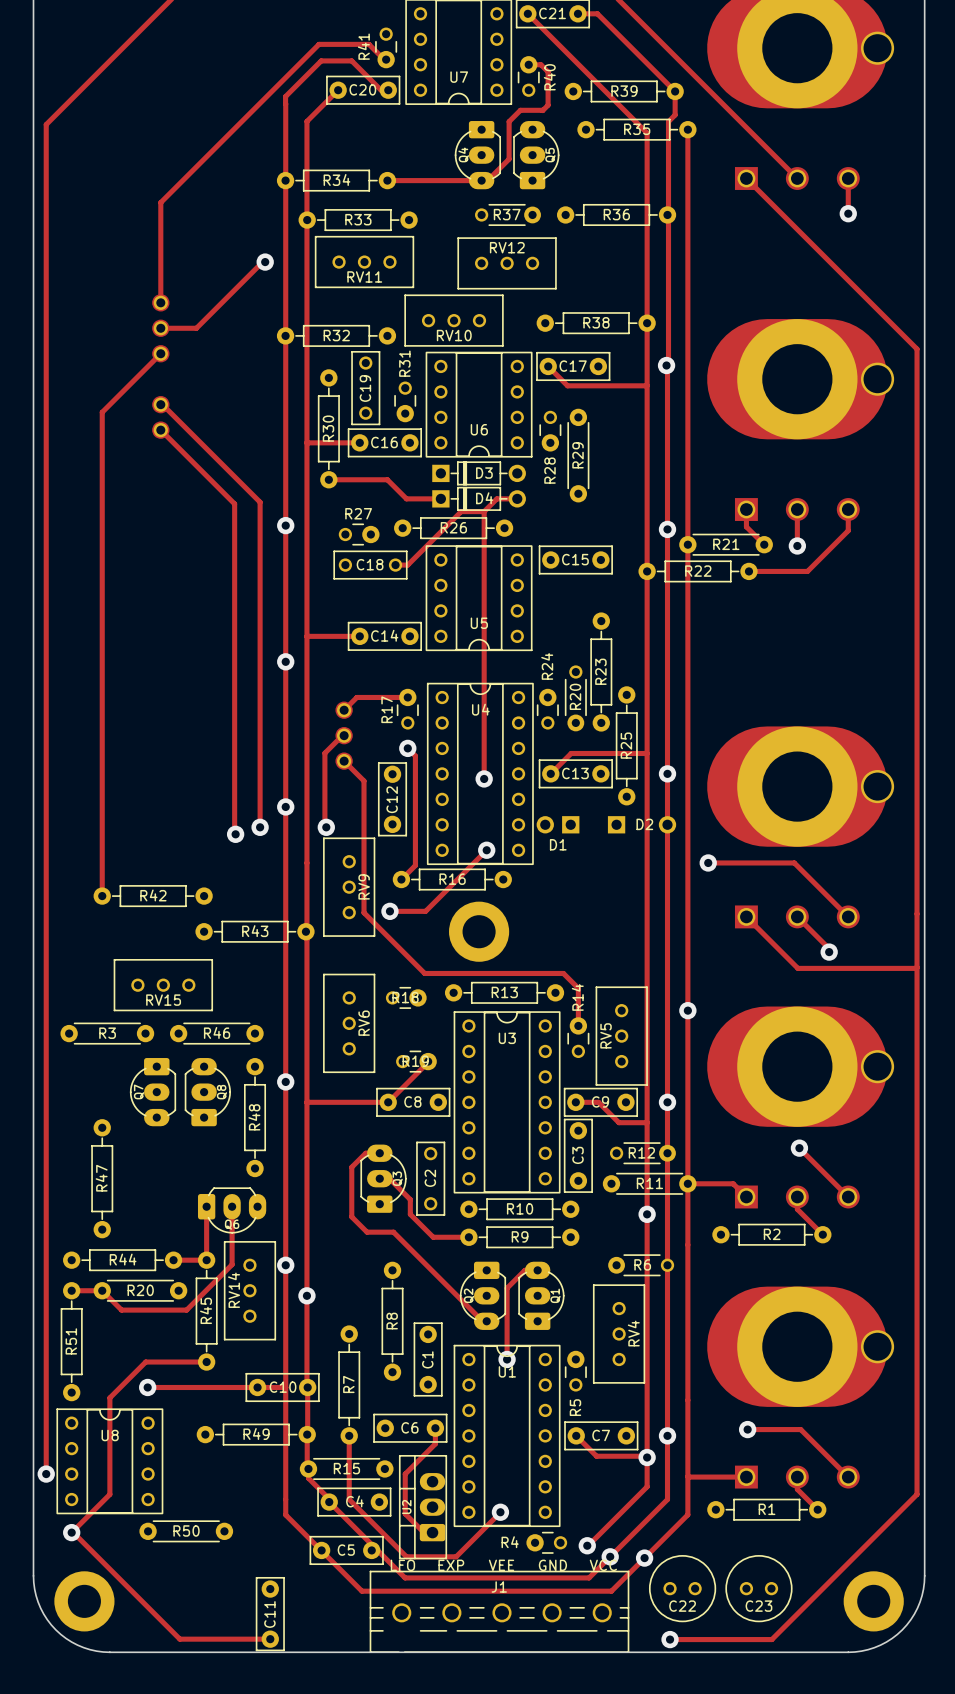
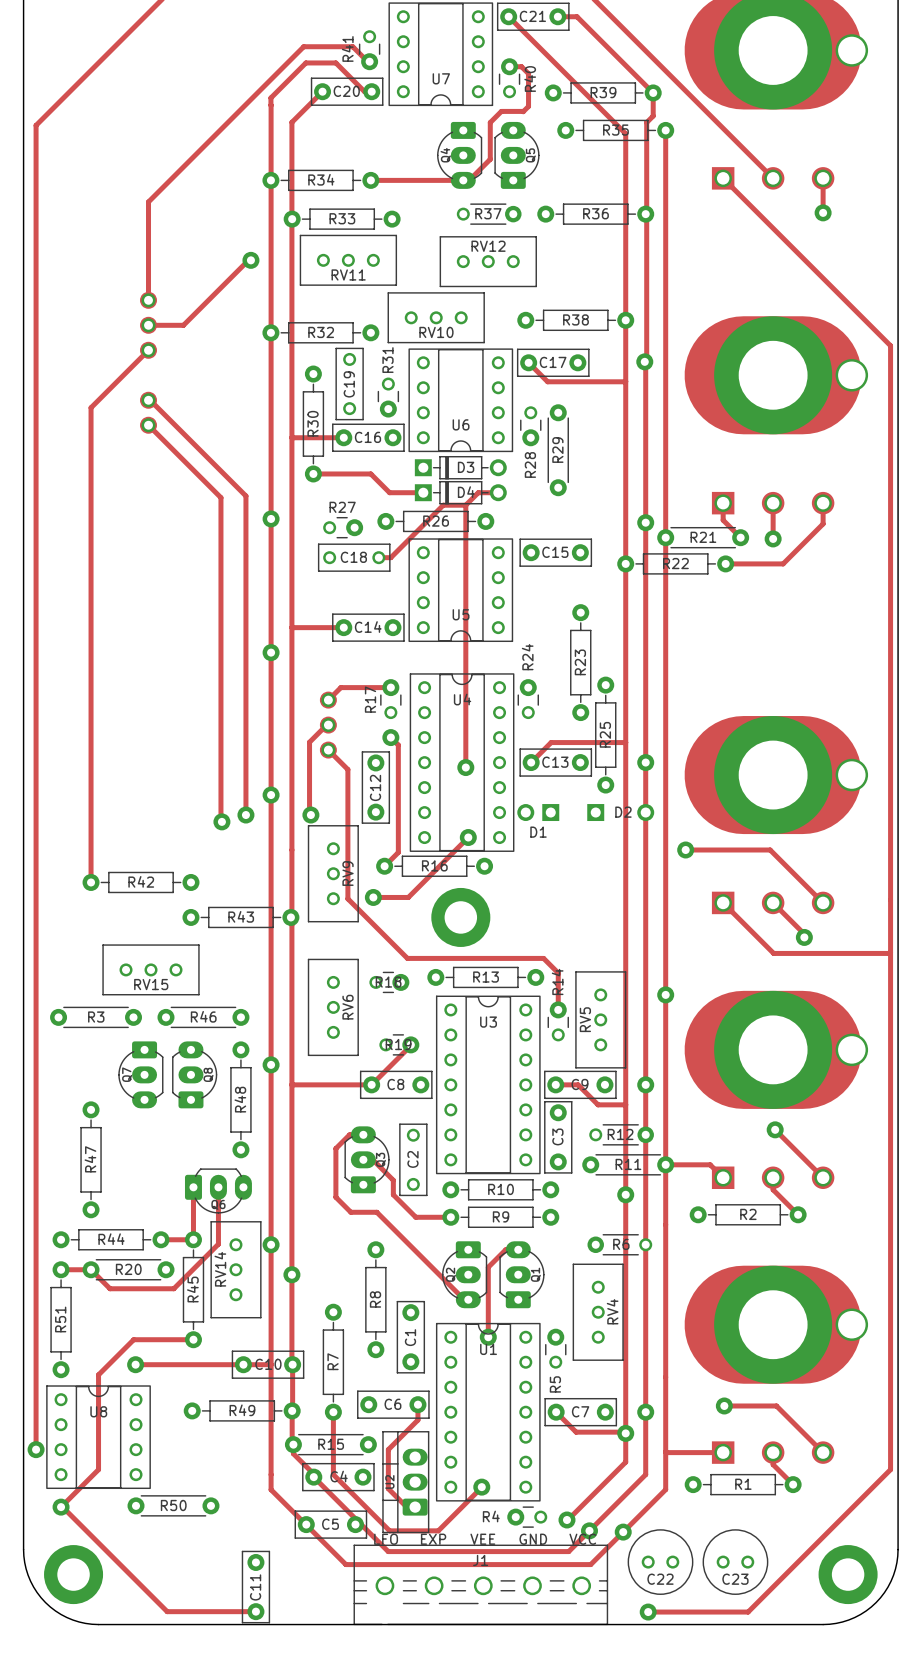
R20: (575, 698) -> none

